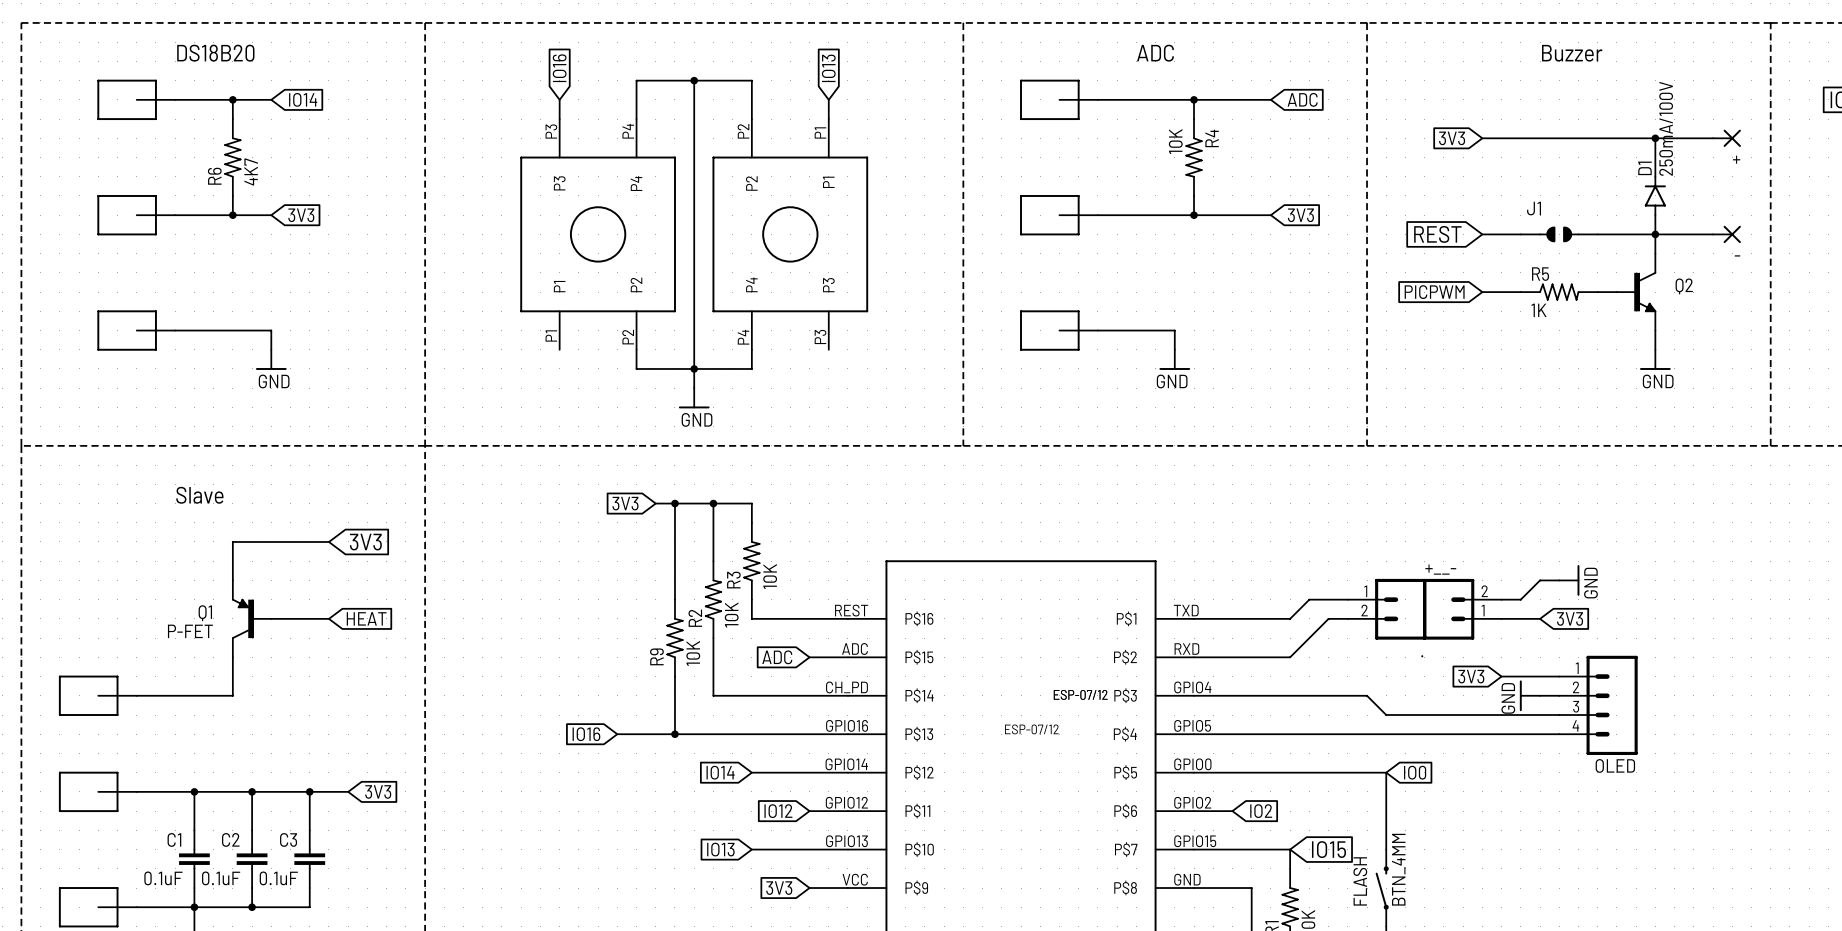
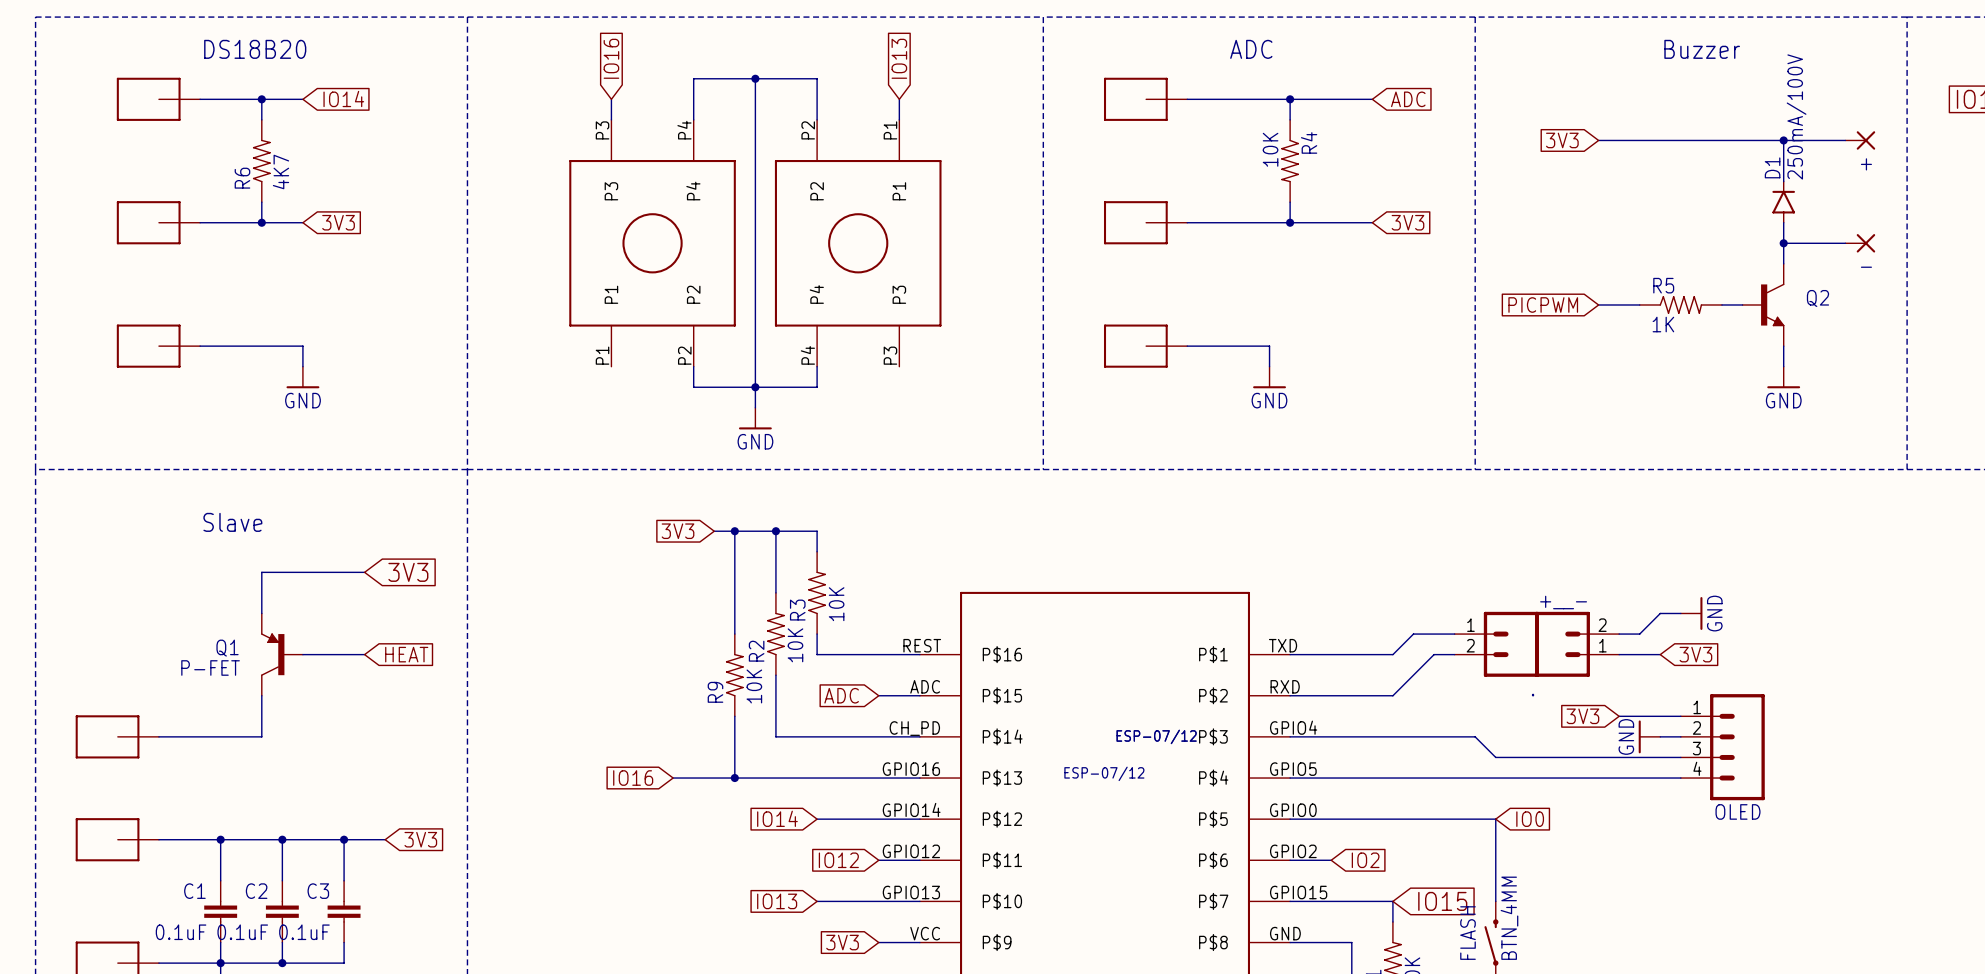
global label: REST (1437, 234) -> none
wire: (1482, 234) (1520, 234) -> none
J1: (1559, 234) -> none
wire: (1597, 234) (1655, 234) -> none

